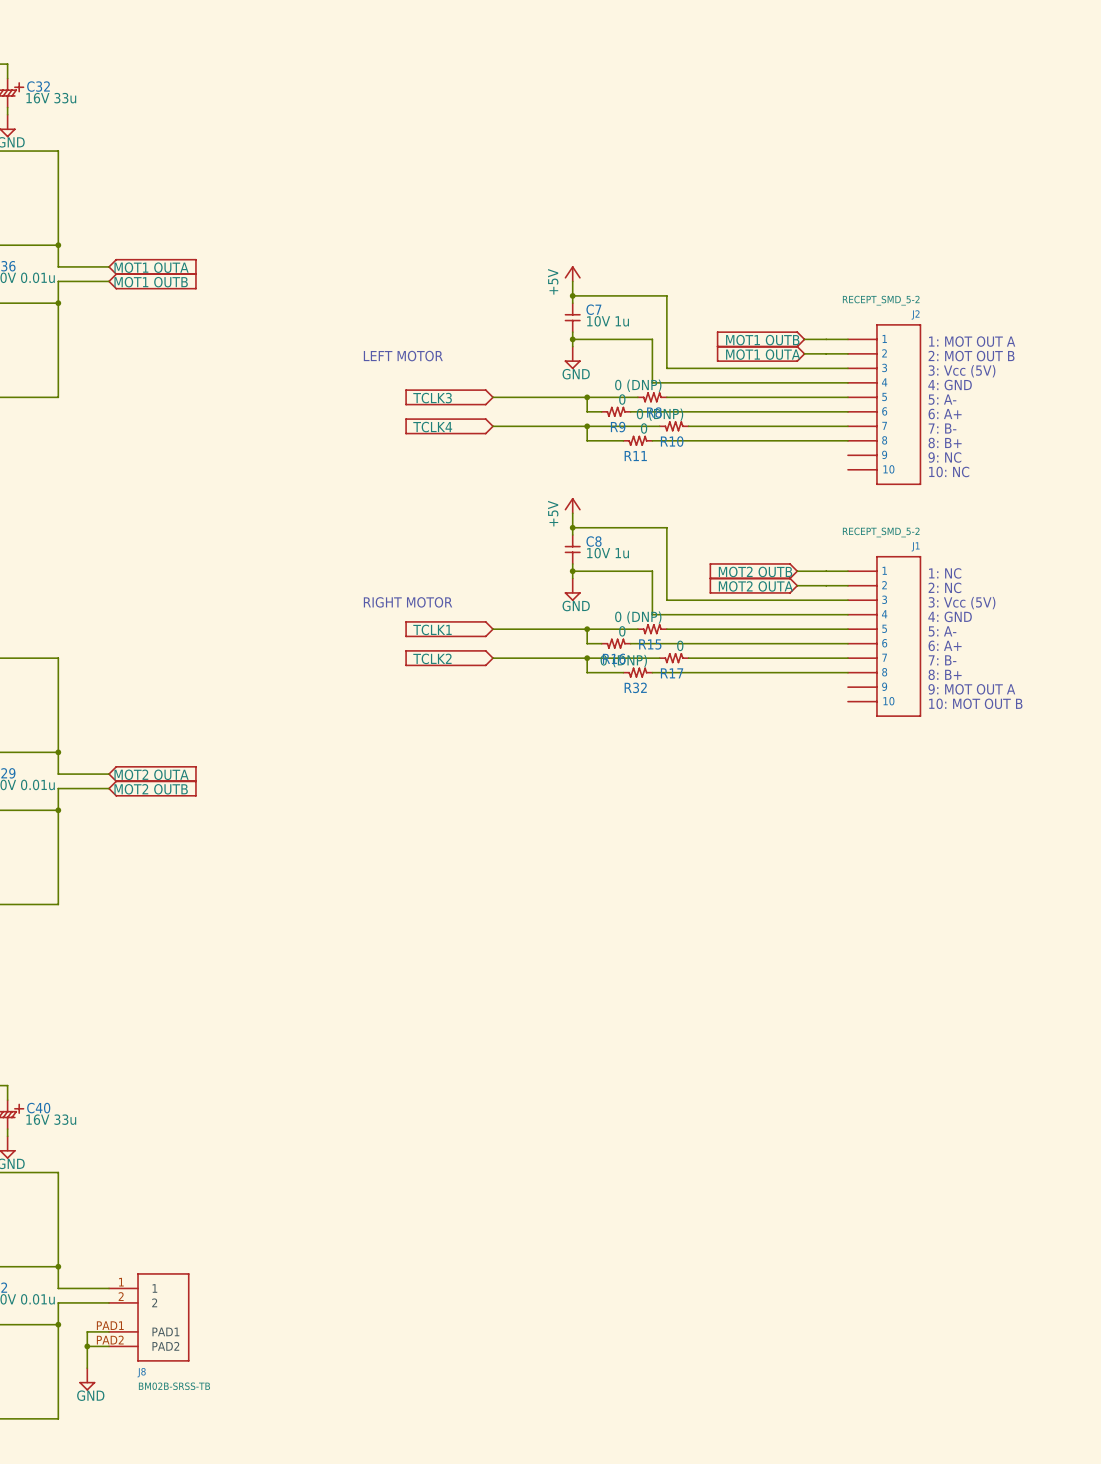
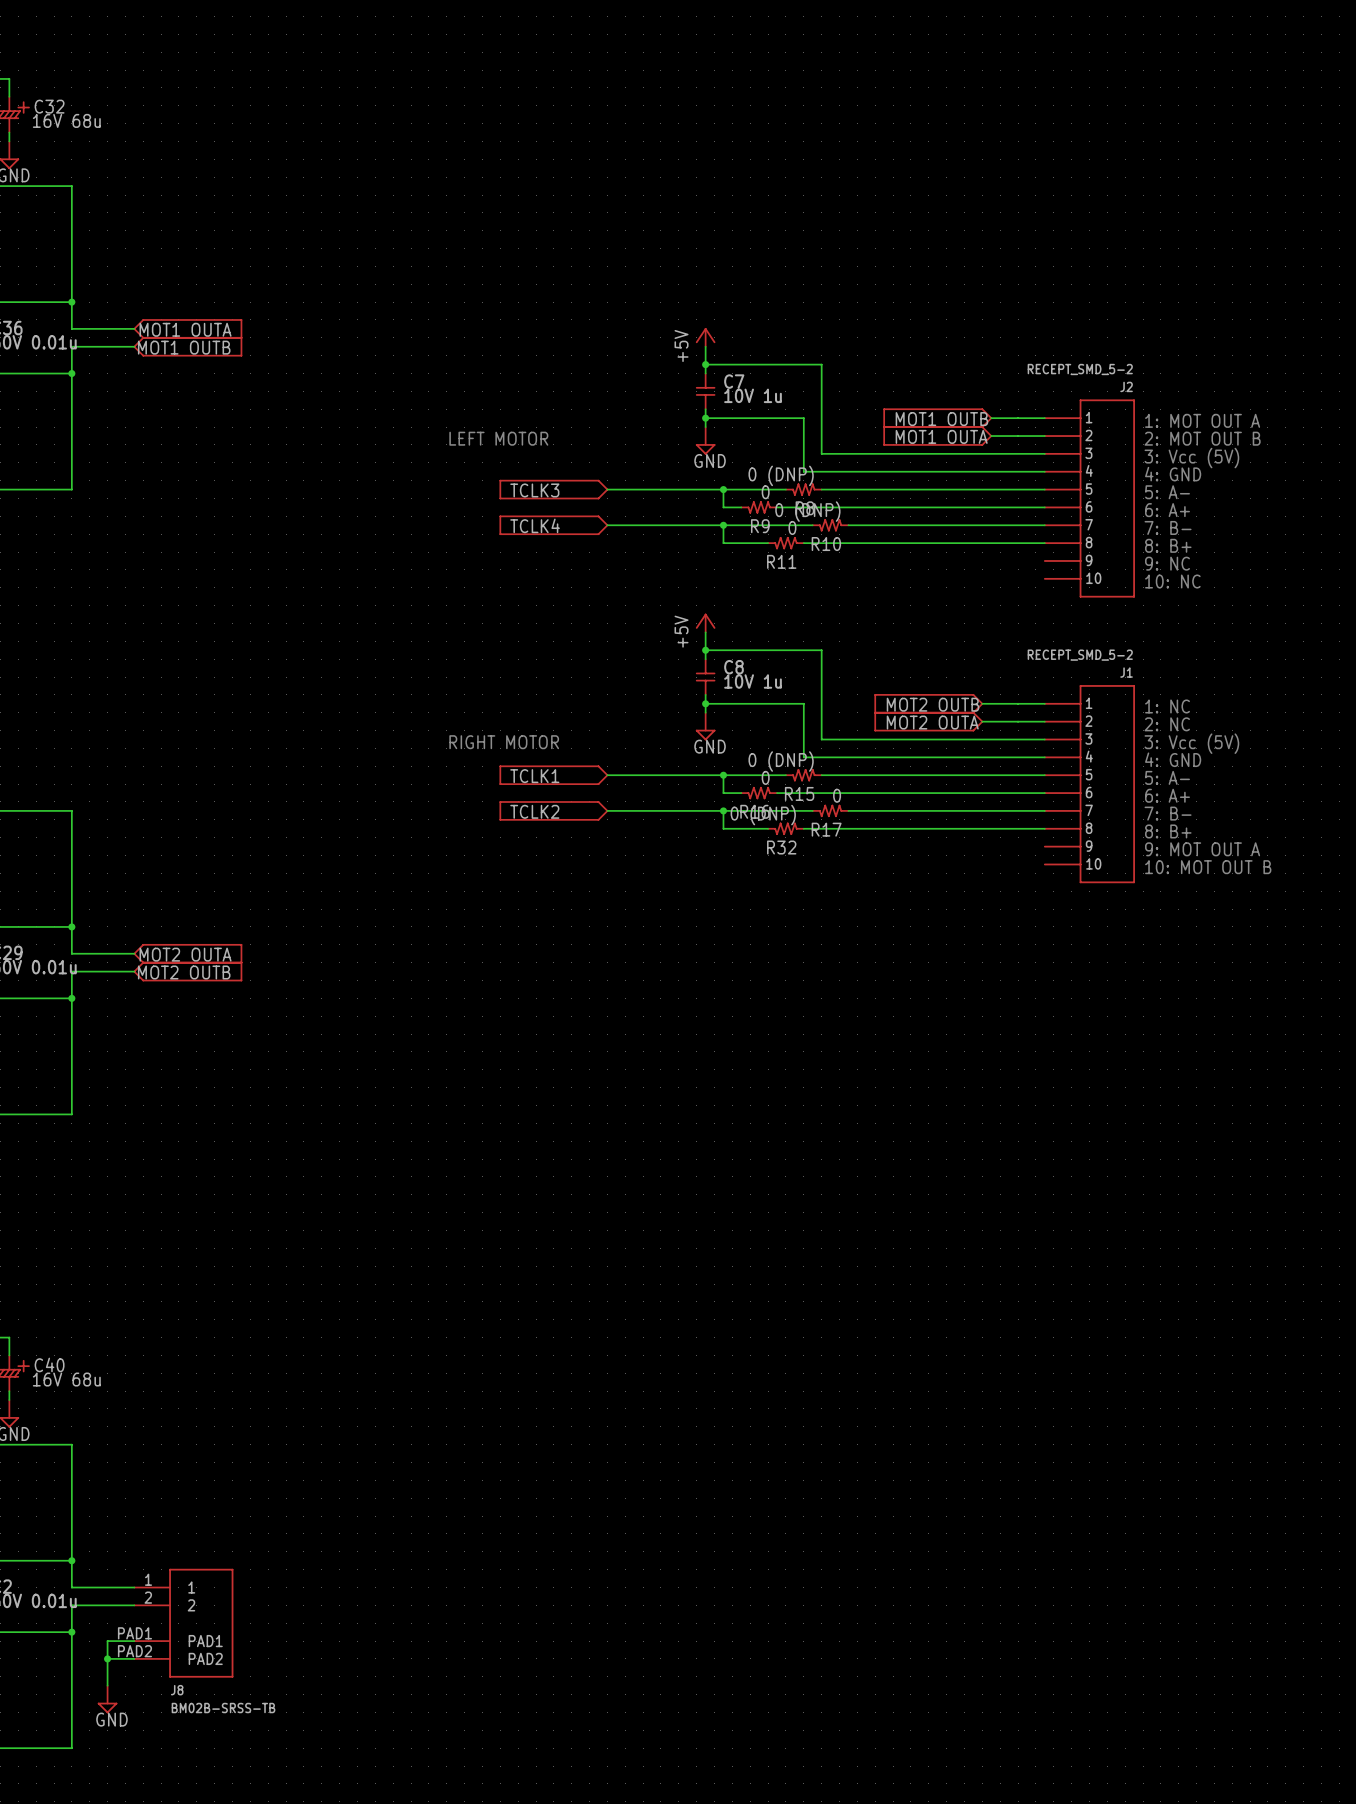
C32 value: 16V 33u (51, 98) -> 16V 68u (66, 120)
C40 value: 16V 33u (51, 1119) -> 16V 68u (66, 1379)

